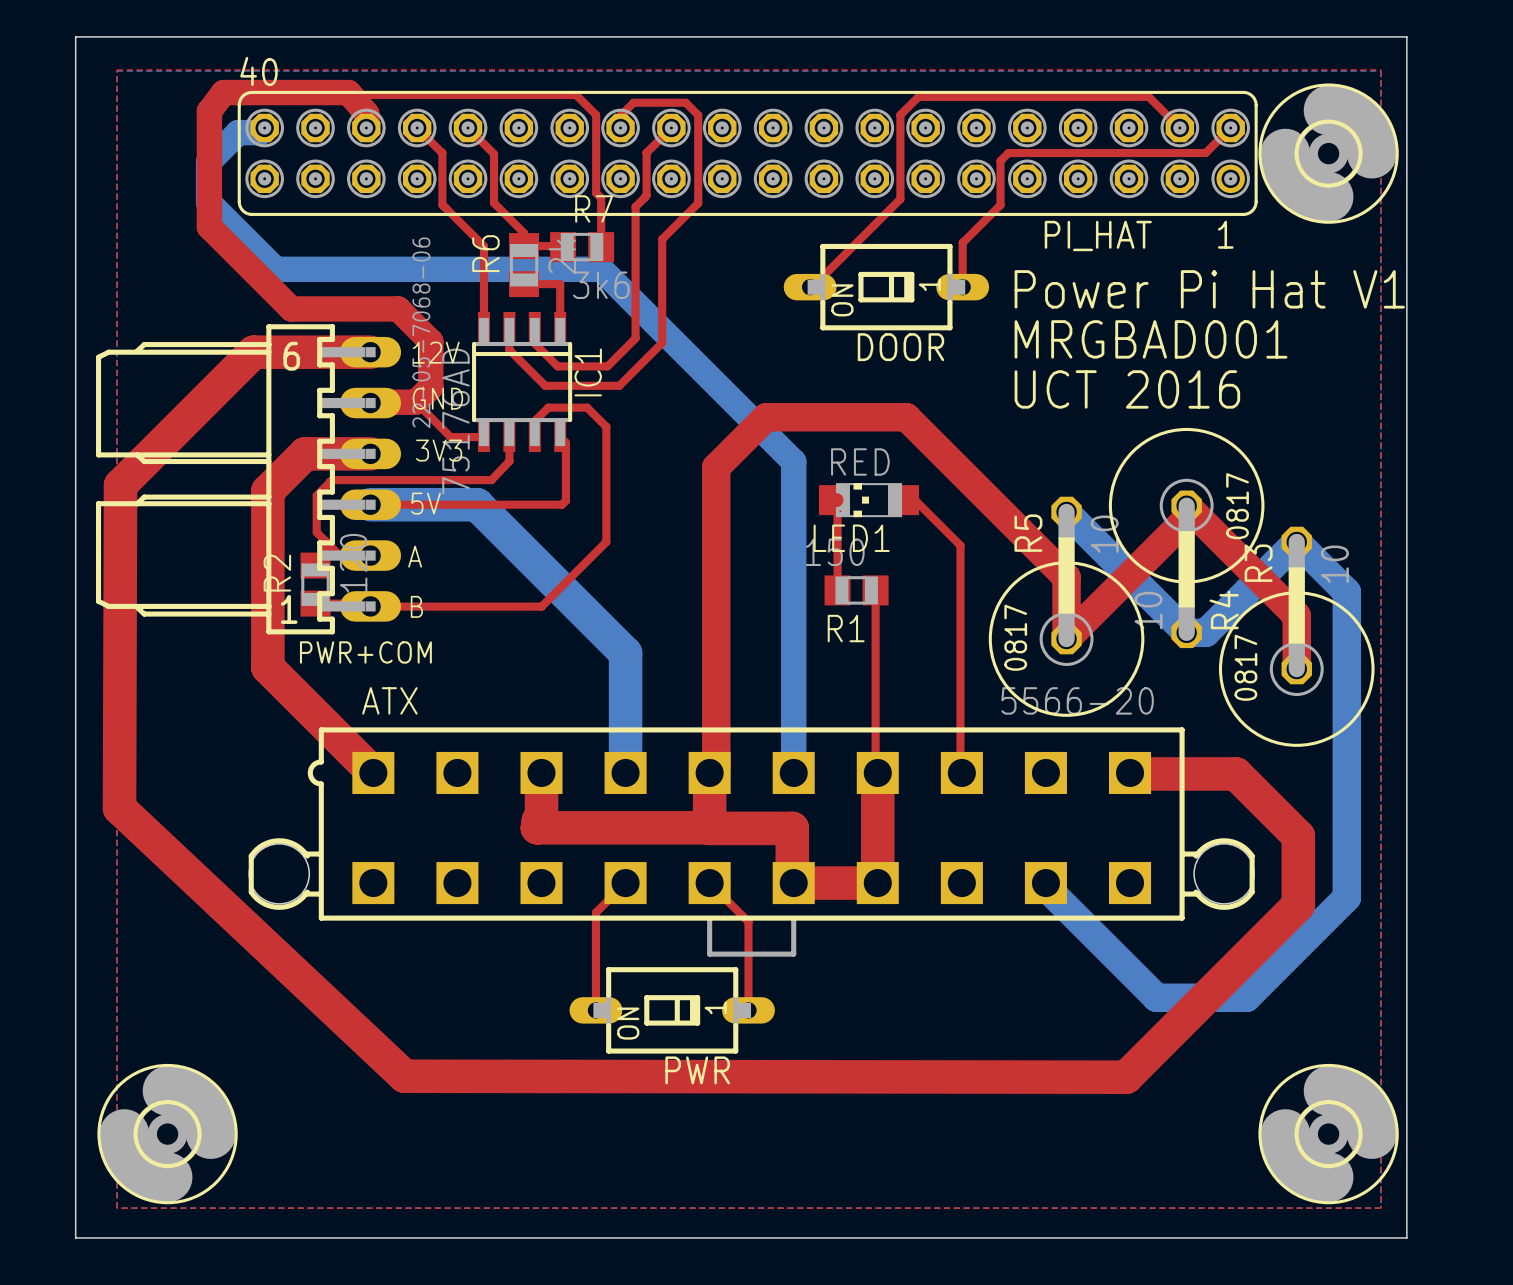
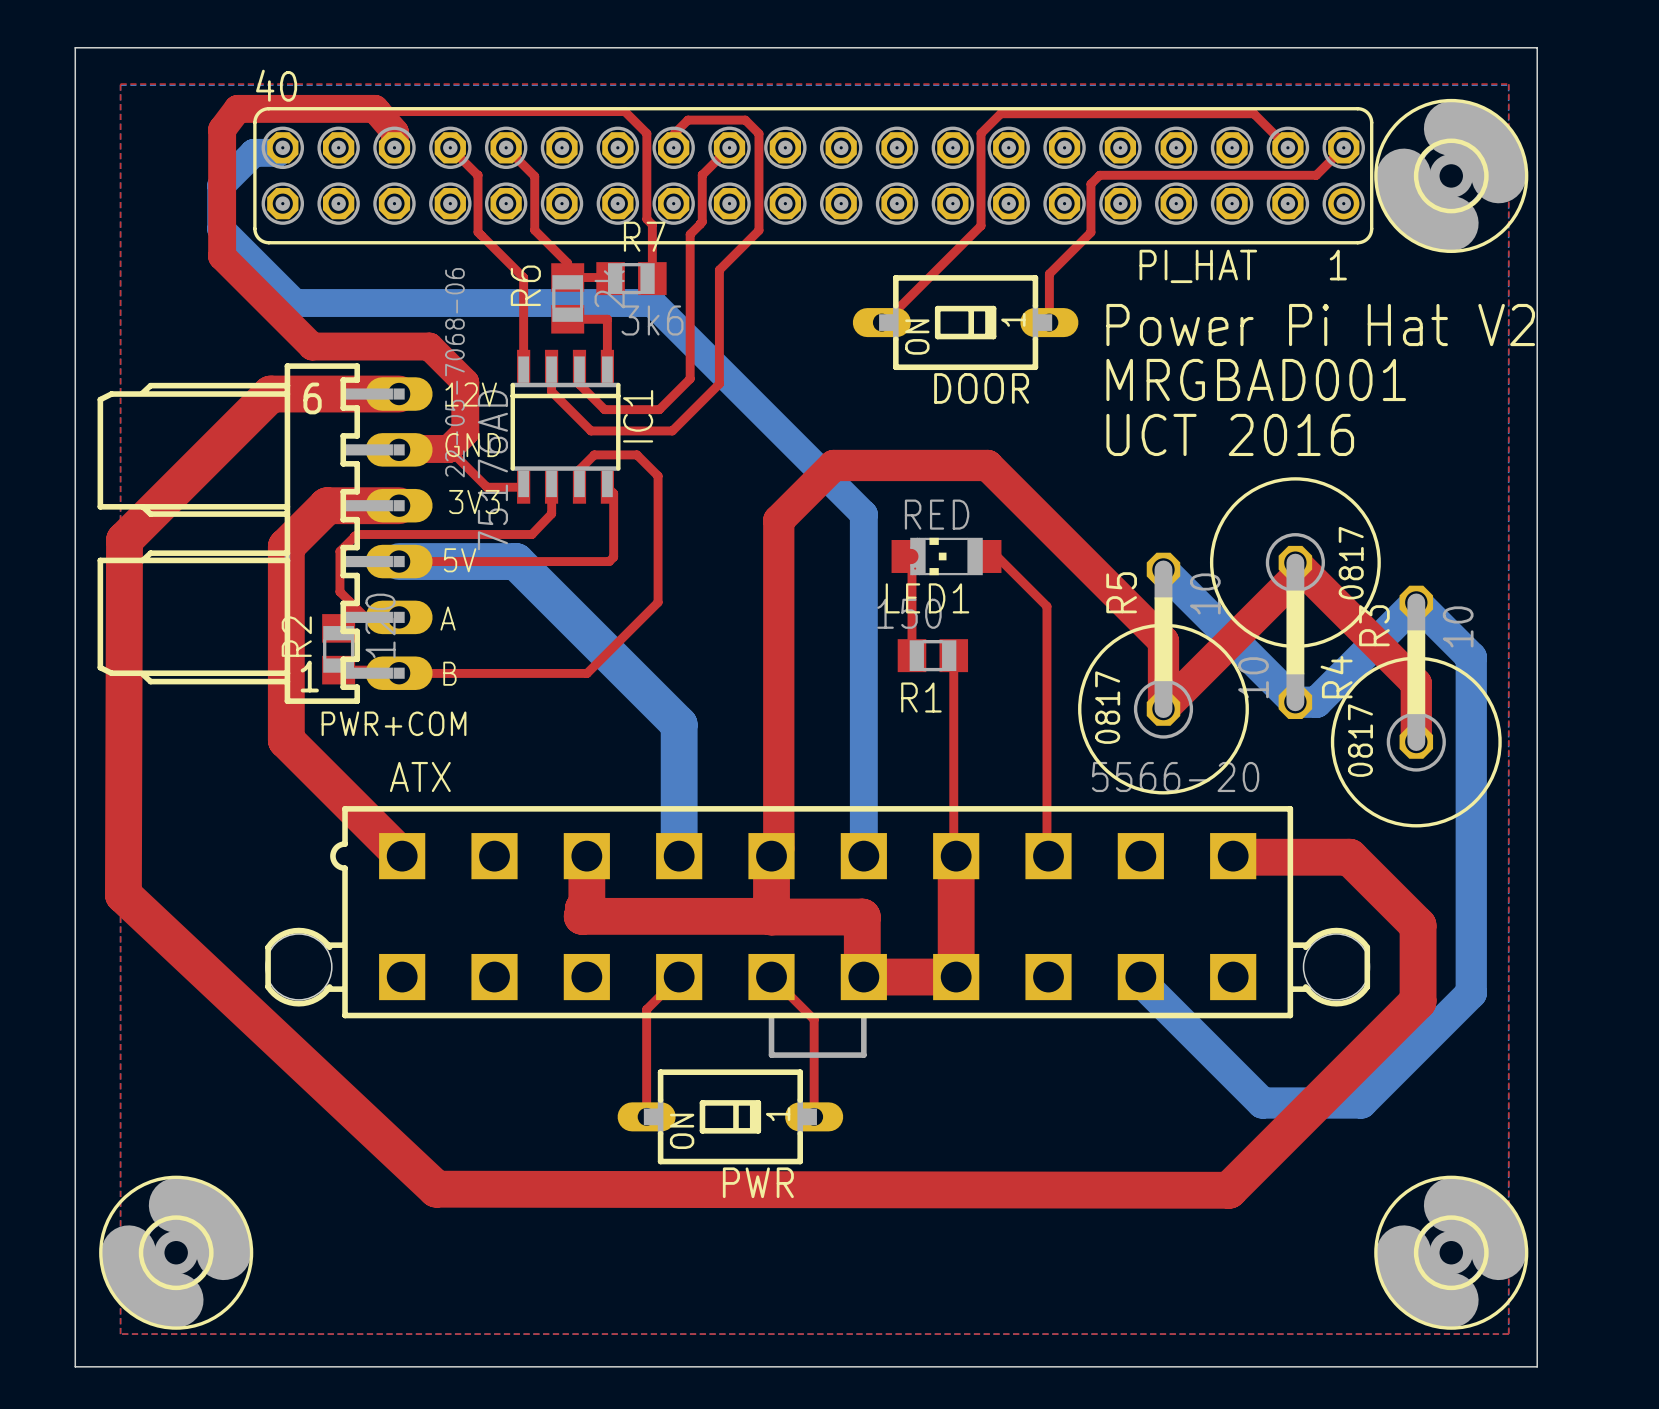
text: Power Pi Hat V1 (1209, 289) -> Power Pi Hat V2 (1320, 325)

